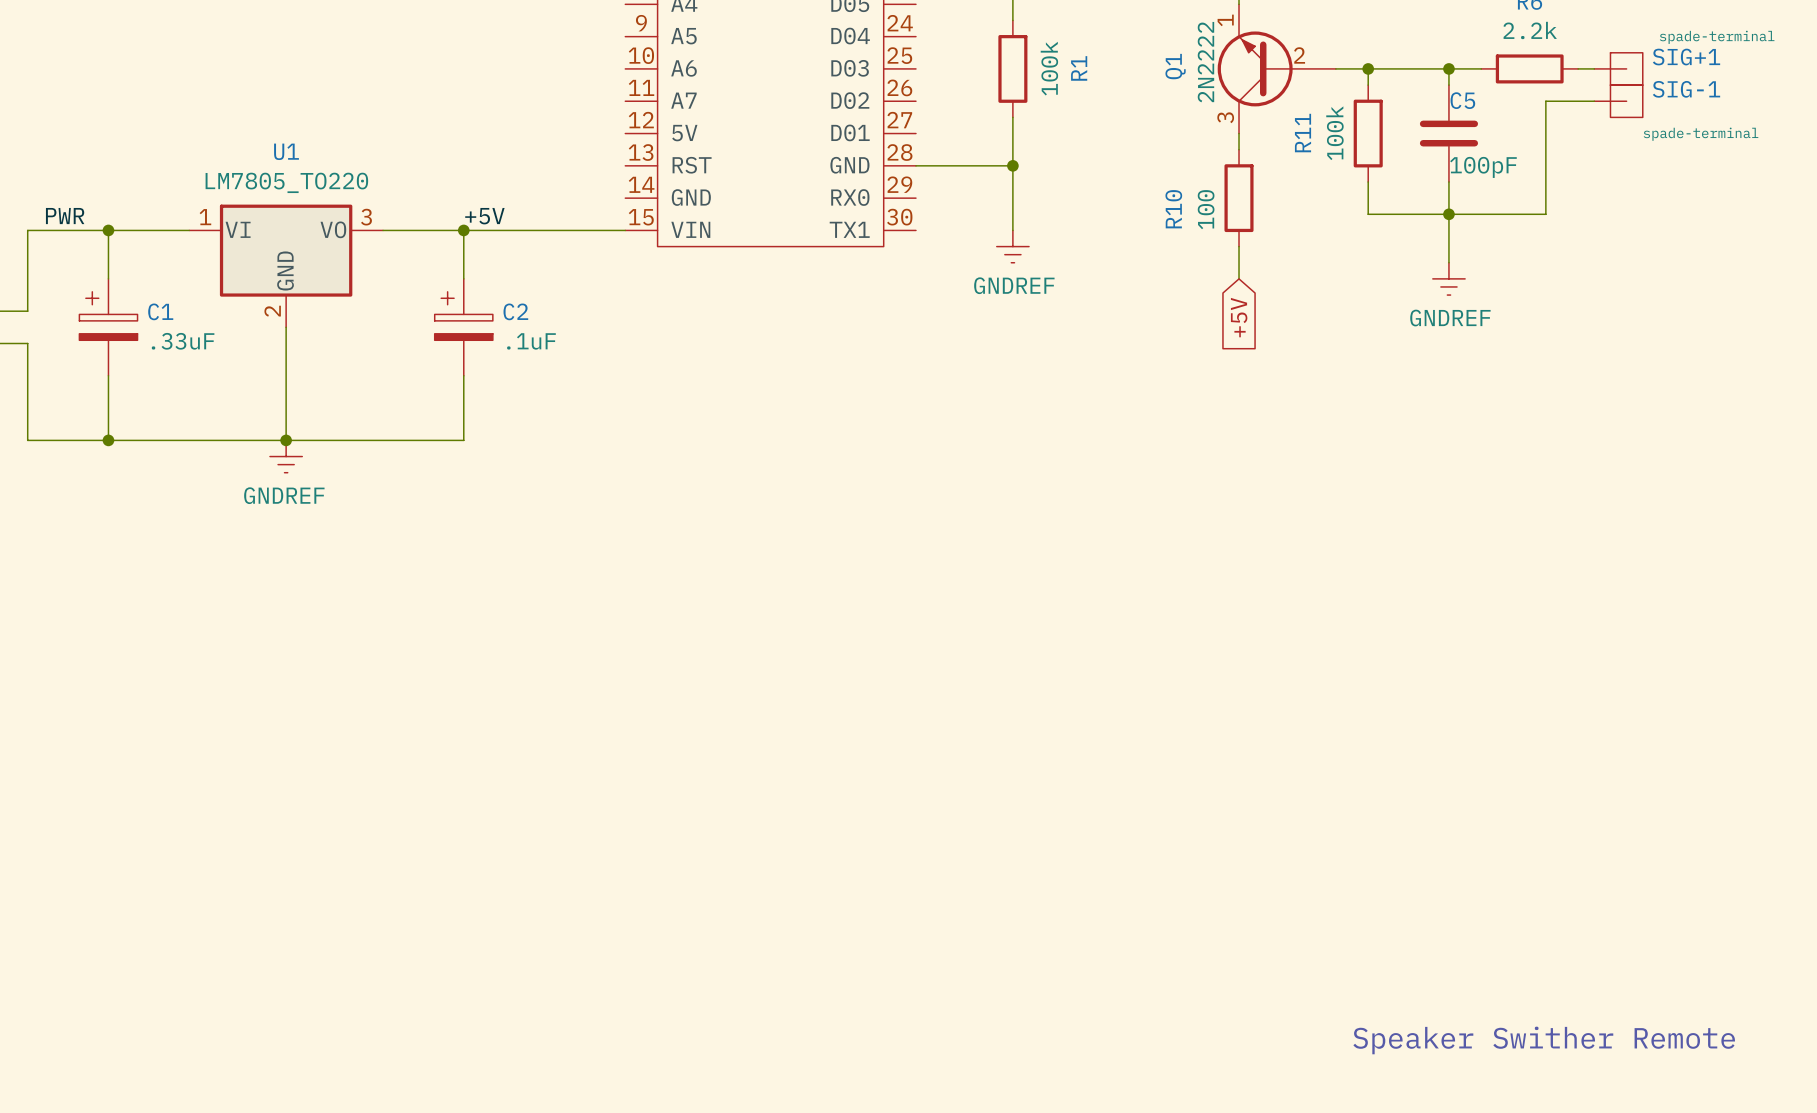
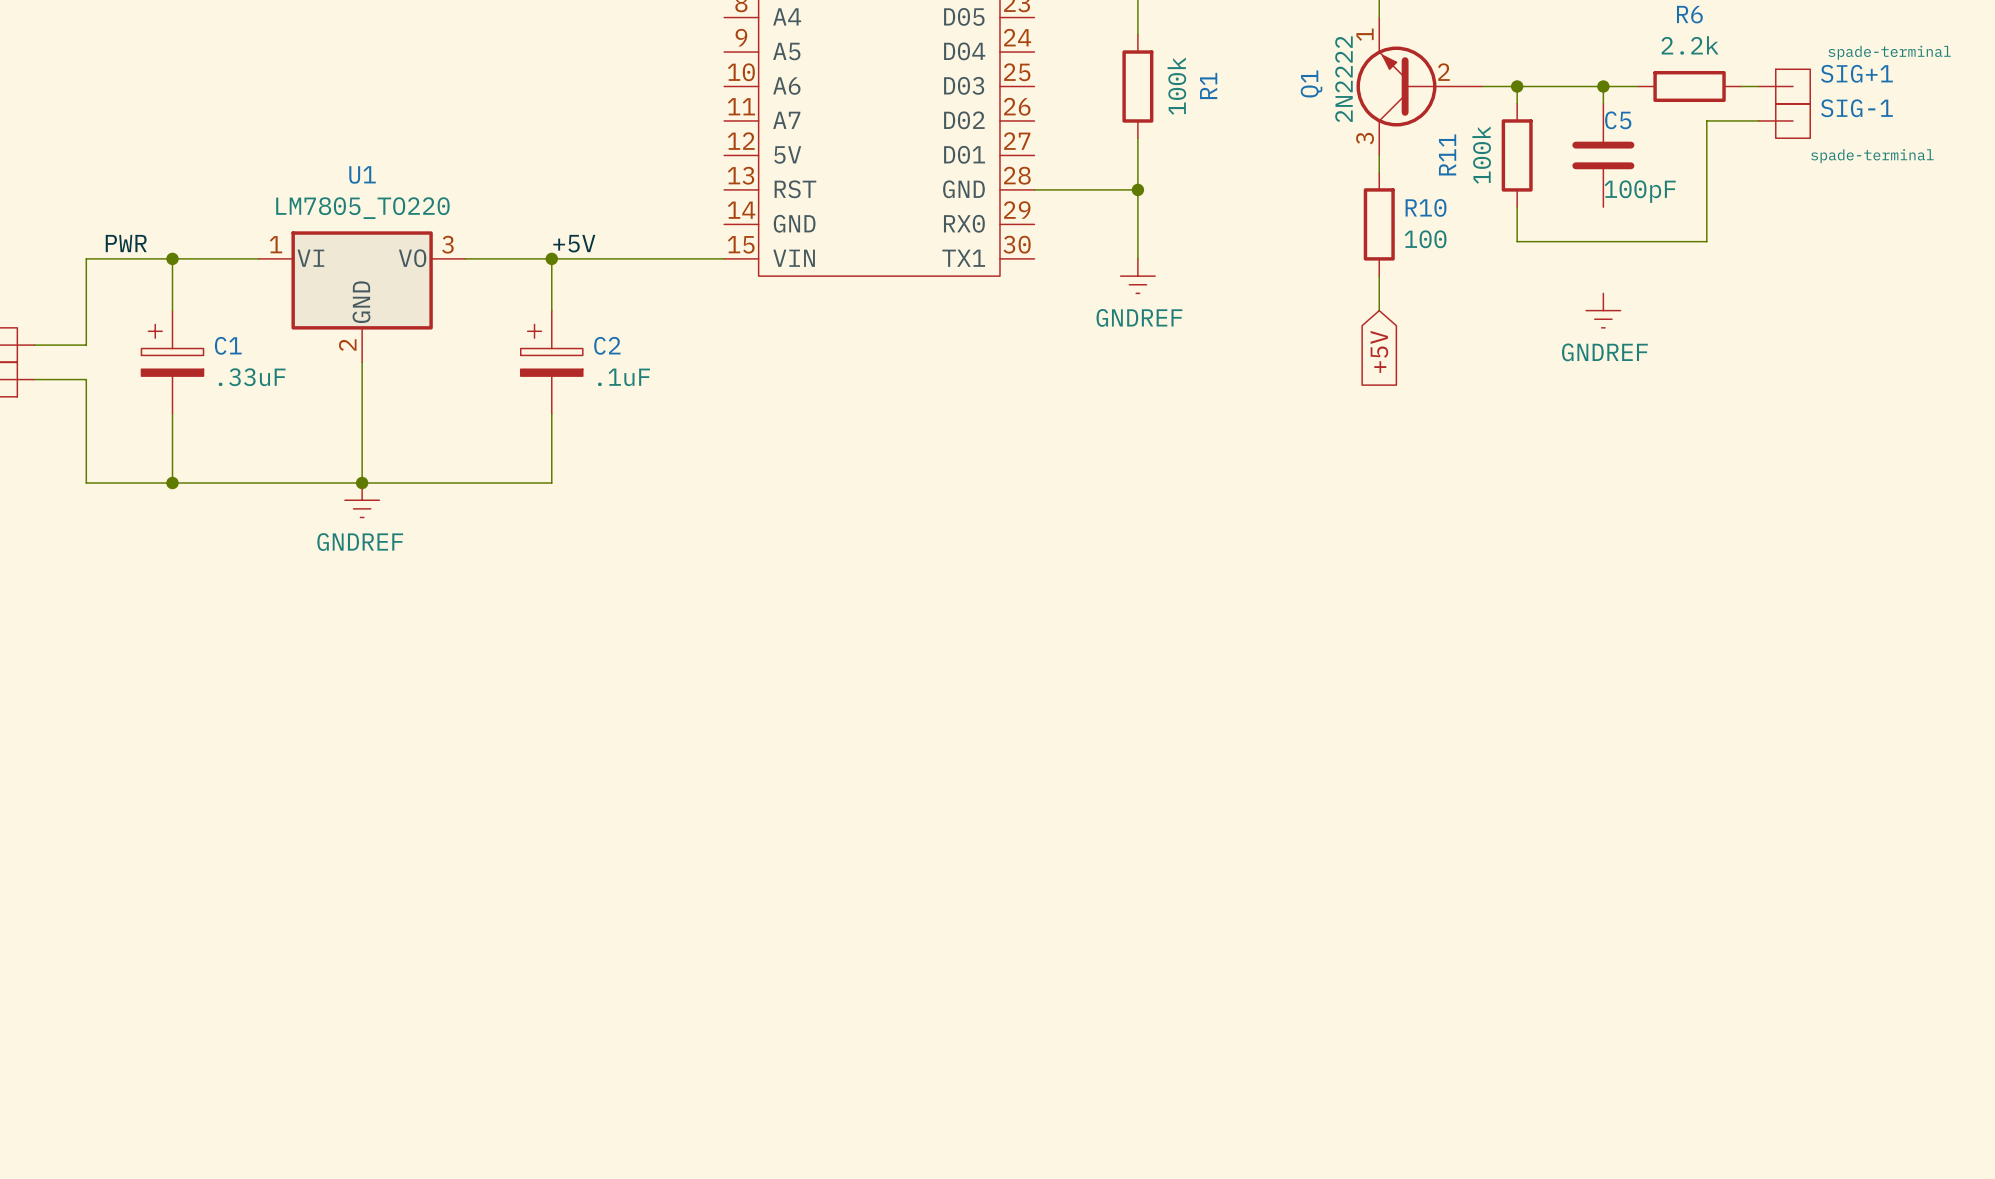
wire: (1448, 181) (1448, 262) -> none
R10 name rotation: 0° (1173, 209) -> 90° clockwise (1426, 207)
R10 name position: R10 (1173, 209) -> R10 (1426, 207)
R10 value rotation: 0° (1206, 209) -> 90° clockwise (1425, 239)
R10 value position: 100 (1206, 209) -> 100 (1425, 239)
junction: (1448, 214) -> none
text: Speaker Swither Remote (1544, 1040) -> none

